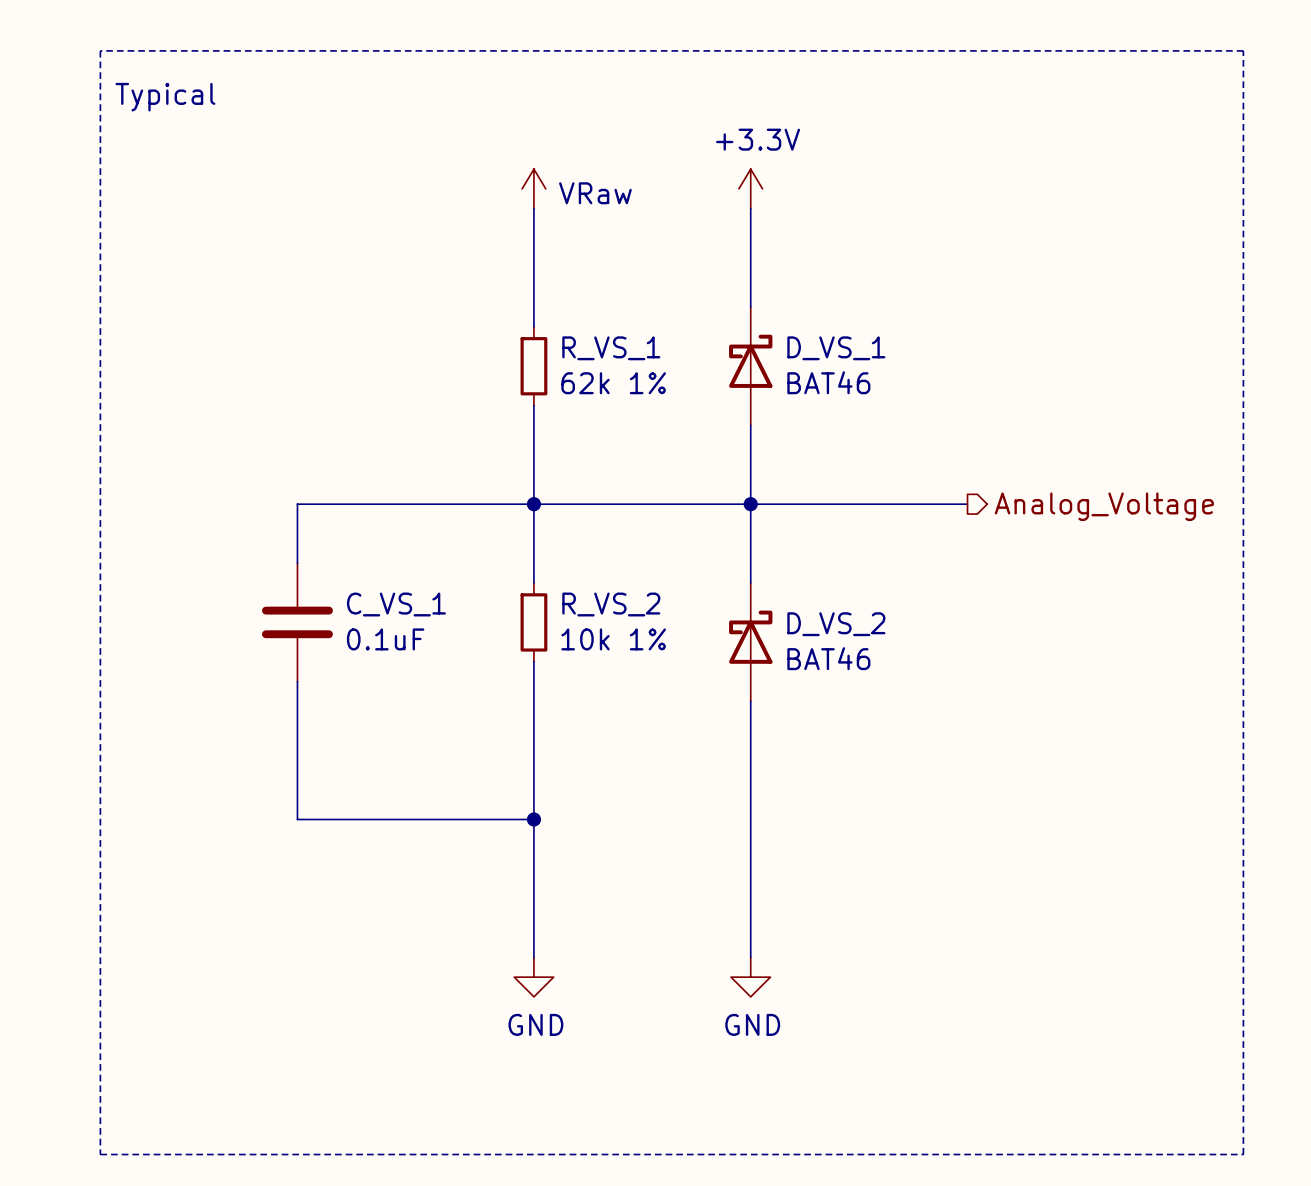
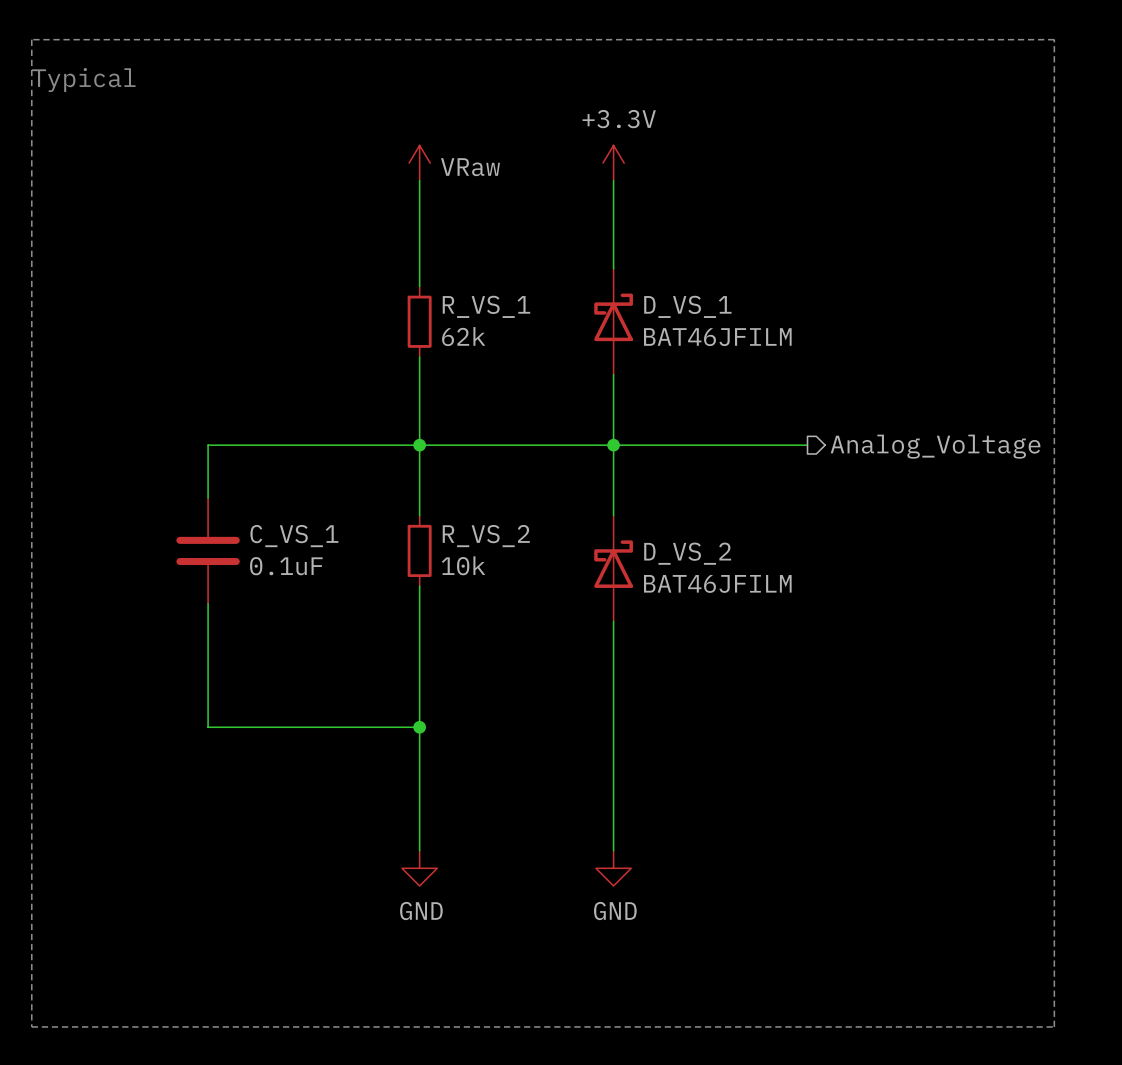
D_VS_1 value: BAT46 (828, 382) -> BAT46JFILM (717, 337)
R_VS_1 value: 62k 1% (613, 383) -> 62k (463, 336)
R_VS_2 value: 10k 1% (613, 639) -> 10k (463, 565)
D_VS_2 value: BAT46 (828, 658) -> BAT46JFILM (717, 583)

